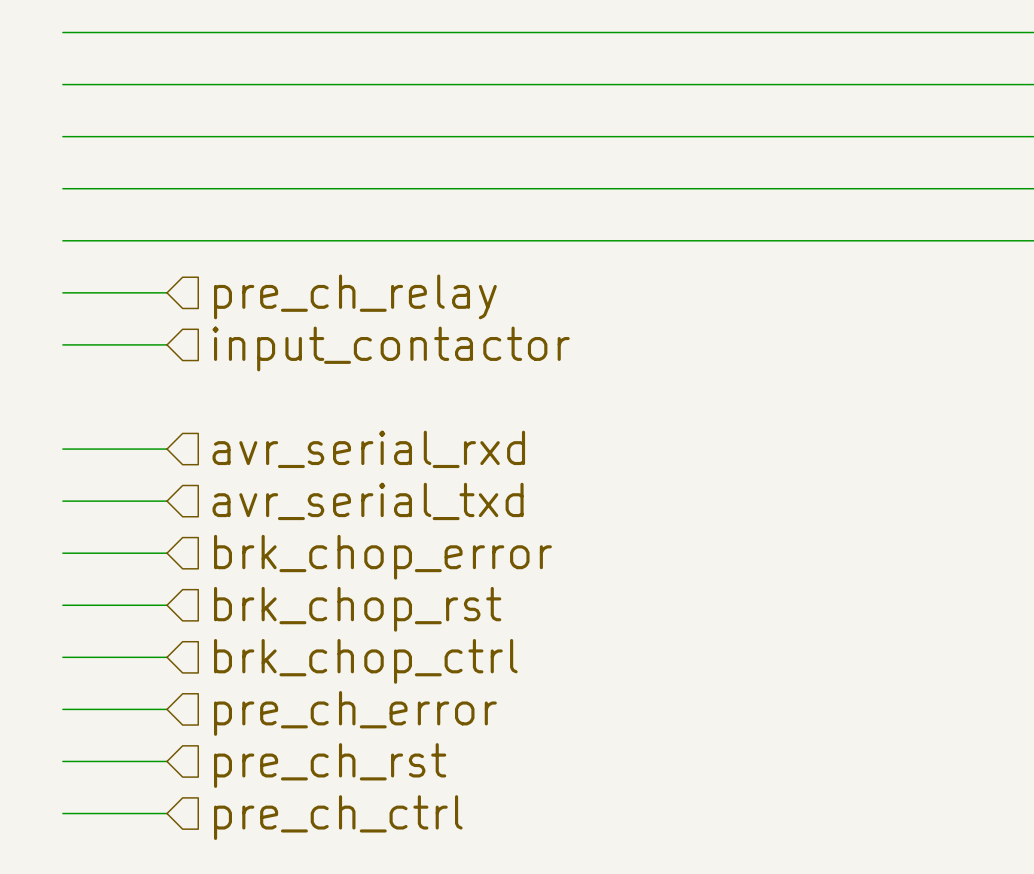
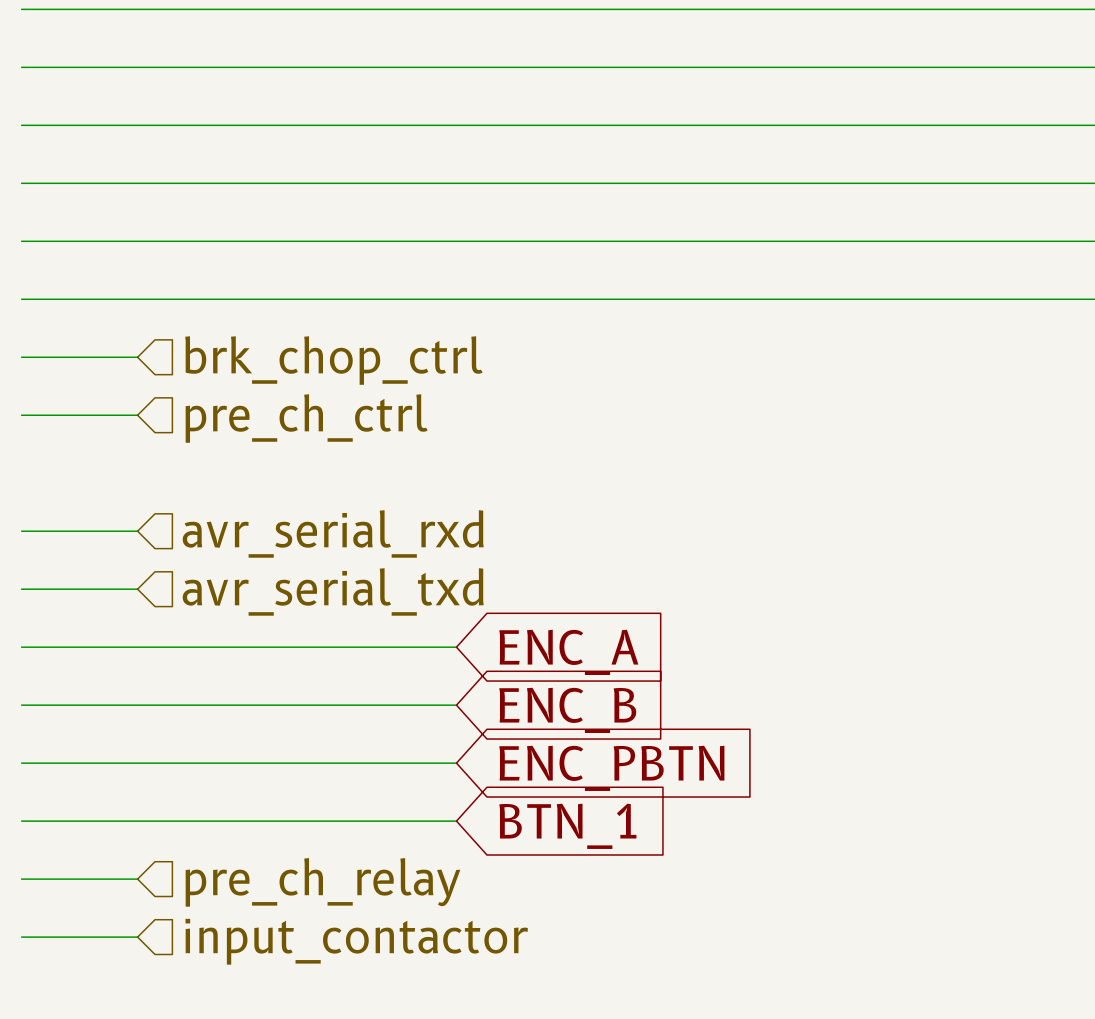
hierarchical label: pre_ch_relay (355, 296) -> brk_chop_ctrl (333, 360)
hierarchical label: input_contactor (391, 348) -> pre_ch_ctrl (306, 418)
wire: none -> (137, 647) (456, 647)
global label: none -> ENC_A (568, 652)
hierarchical label: brk_chop_error (382, 557) -> none
wire: none -> (137, 705) (456, 705)
global label: none -> ENC_B (567, 710)
hierarchical label: brk_chop_rst (357, 609) -> none
wire: none -> (137, 763) (456, 763)
global label: none -> ENC_PBTN (611, 768)
hierarchical label: brk_chop_ctrl (365, 661) -> none
wire: none -> (137, 821) (456, 821)
global label: none -> BTN_1 (567, 826)
hierarchical label: pre_ch_error (355, 713) -> none
hierarchical label: pre_ch_rst (330, 765) -> pre_ch_relay (323, 882)
hierarchical label: pre_ch_ctrl (338, 817) -> input_contactor (356, 941)

